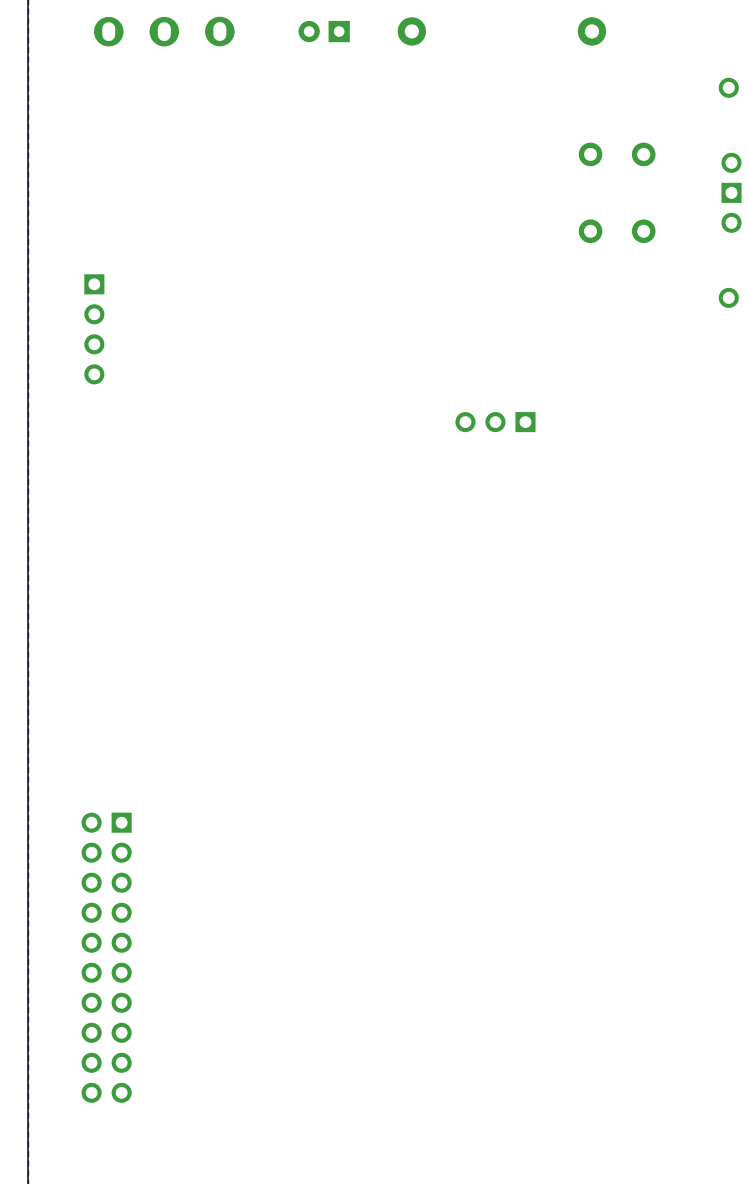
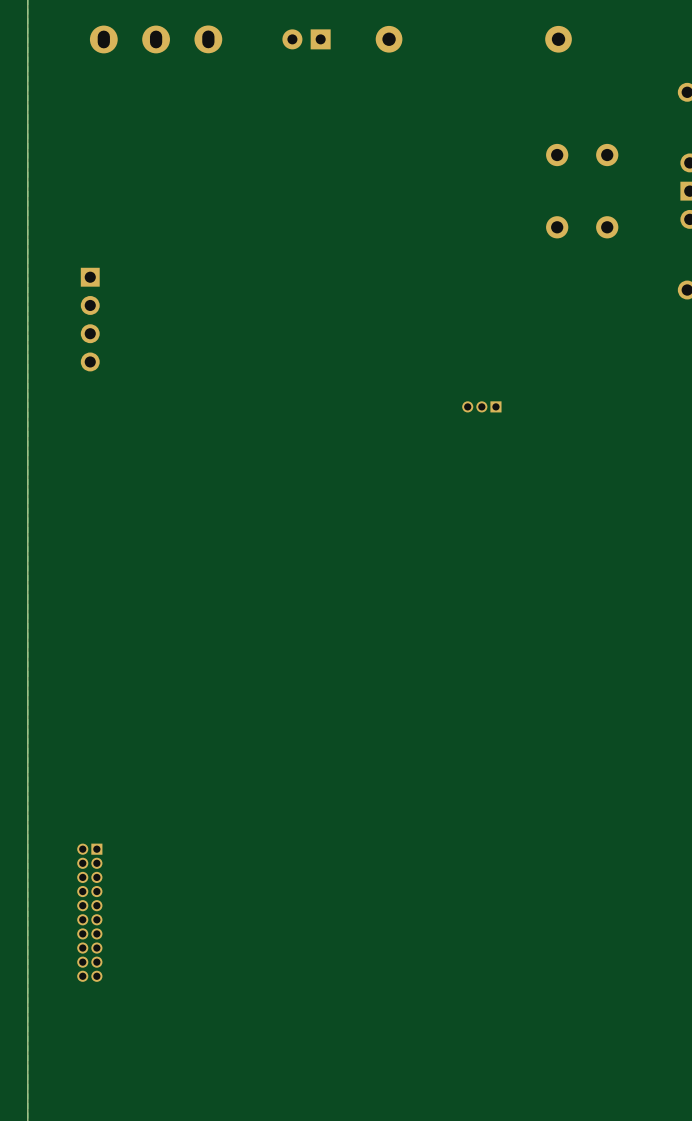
part: (495, 422) -> none
part: none -> (481, 406)
part: (106, 957) -> none
part: none -> (89, 912)

